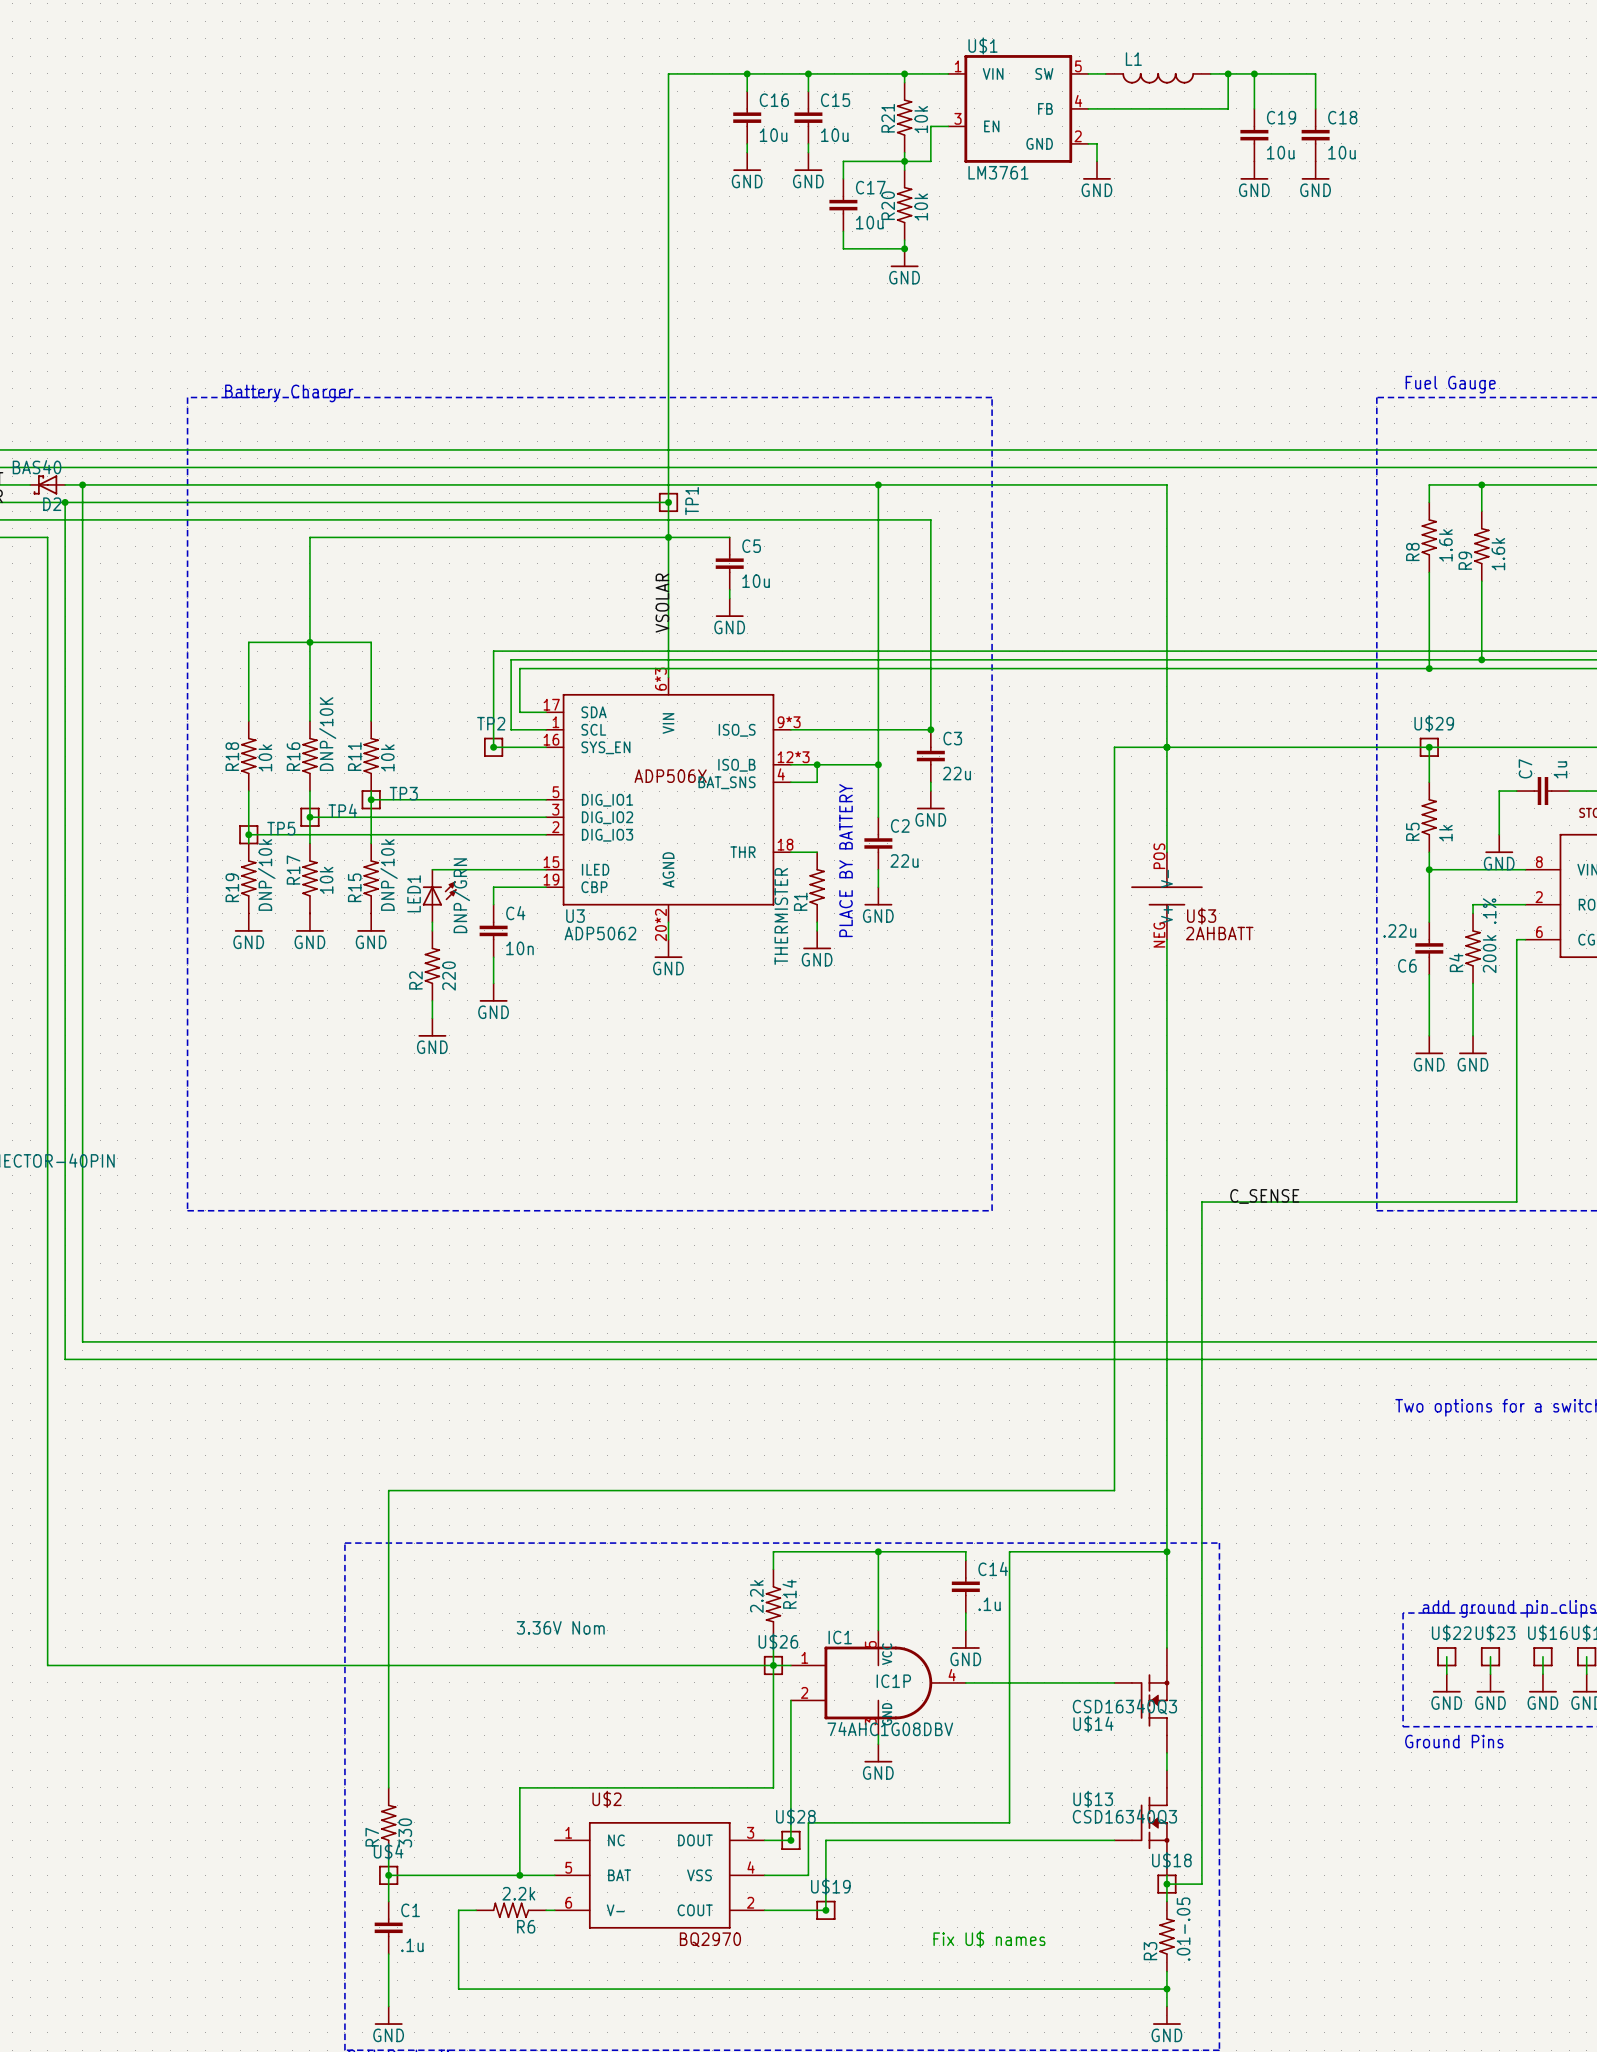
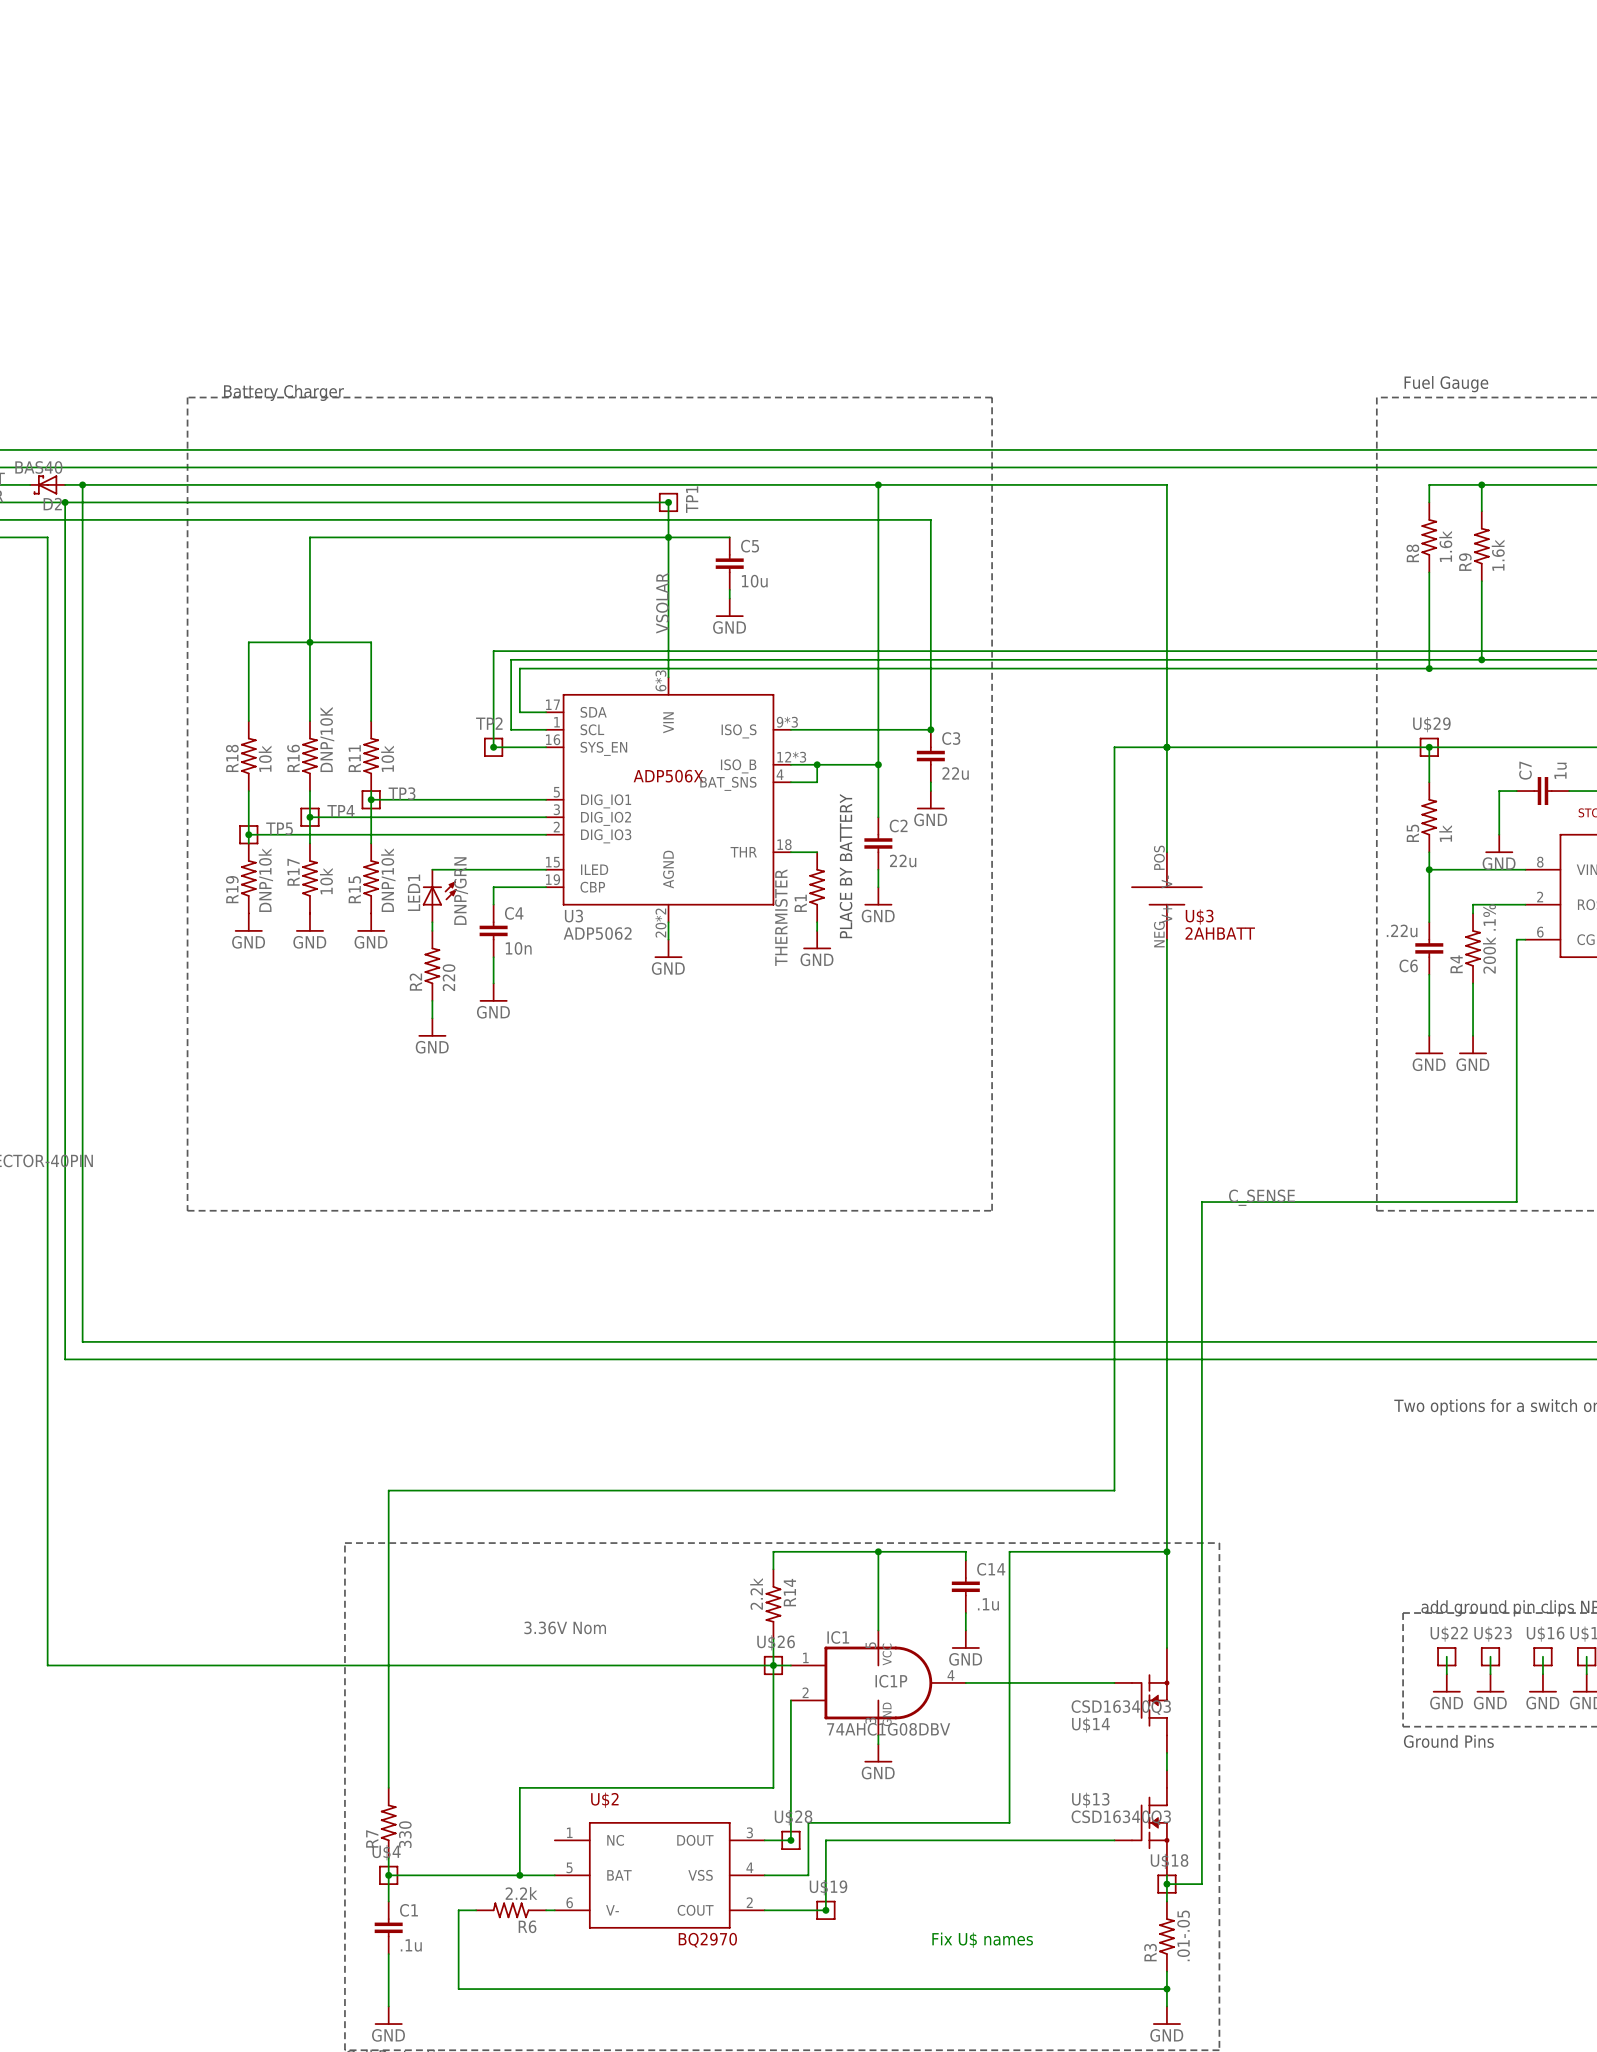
wire: (747, 73) (747, 91) -> none
junction: (747, 73) -> none
wire: (808, 73) (808, 91) -> none
junction: (808, 73) -> none
wire: (904, 73) (904, 82) -> none
junction: (904, 73) -> none
wire: (948, 73) (668, 73) (668, 502) -> none
wire: (1088, 73) (1105, 73) -> none
wire: (1210, 73) (1315, 73) (1315, 108) -> none
wire: (1228, 73) (1228, 108) (1088, 108) -> none
junction: (1228, 73) -> none
wire: (1254, 73) (1254, 108) -> none
junction: (1254, 73) -> none
L1: (1158, 78) -> none
U$1: LM3761 (1018, 108) -> none
C16: 10u (747, 117) -> none
C15: 10u (808, 117) -> none
R21: 10k (904, 117) -> none
wire: (948, 126) (930, 126) (930, 161) (843, 161) (843, 178) -> none
C19: 10u (1254, 135) -> none
C18: 10u (1315, 135) -> none
wire: (747, 143) (747, 152) -> none
wire: (808, 143) (808, 152) -> none
wire: (1088, 143) (1097, 143) (1097, 161) -> none
wire: (904, 152) (904, 170) -> none
power symbol: GND (747, 161) -> none
power symbol: GND (808, 161) -> none
junction: (904, 161) -> none
power symbol: GND (1097, 170) -> none
power symbol: GND (1254, 170) -> none
power symbol: GND (1315, 170) -> none
C17: 10u (843, 205) -> none
R20: 10k (904, 205) -> none
wire: (843, 231) (843, 248) (904, 248) (904, 240) -> none
junction: (904, 248) -> none
power symbol: GND (904, 258) -> none

